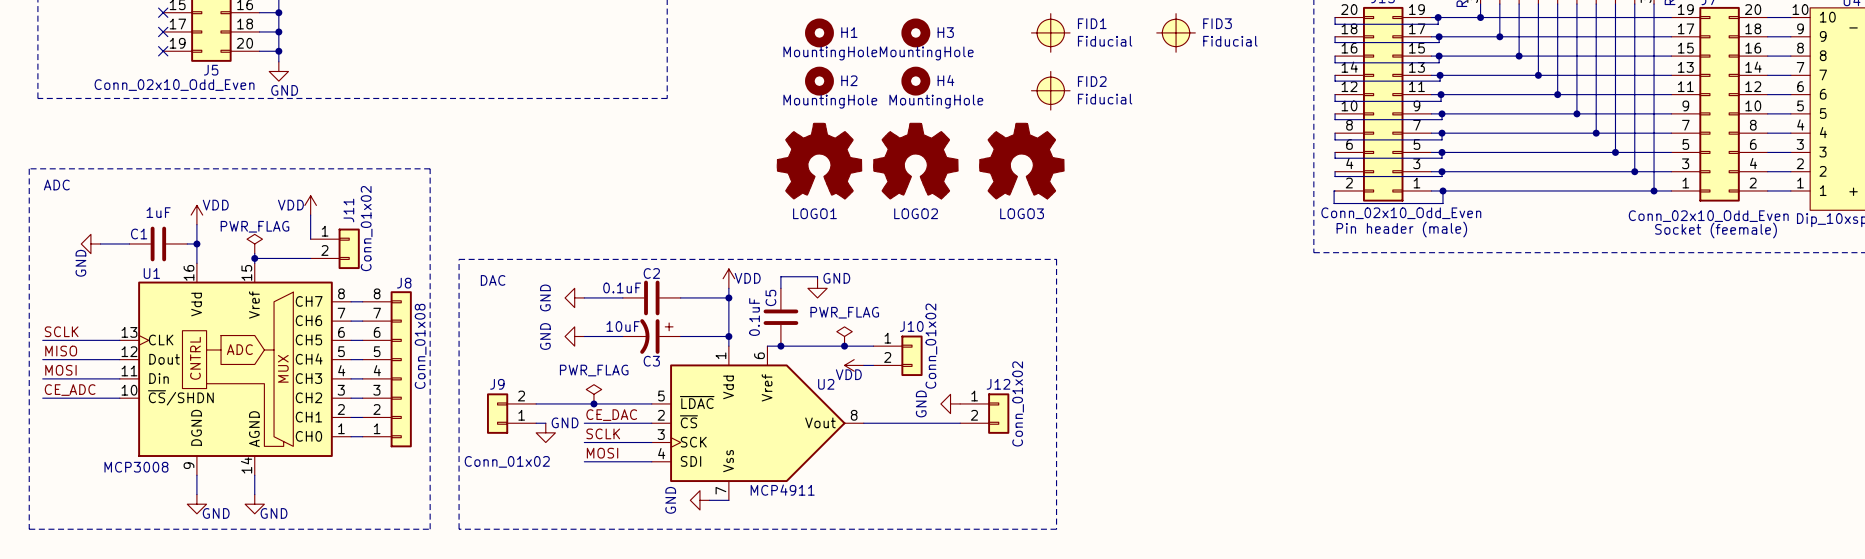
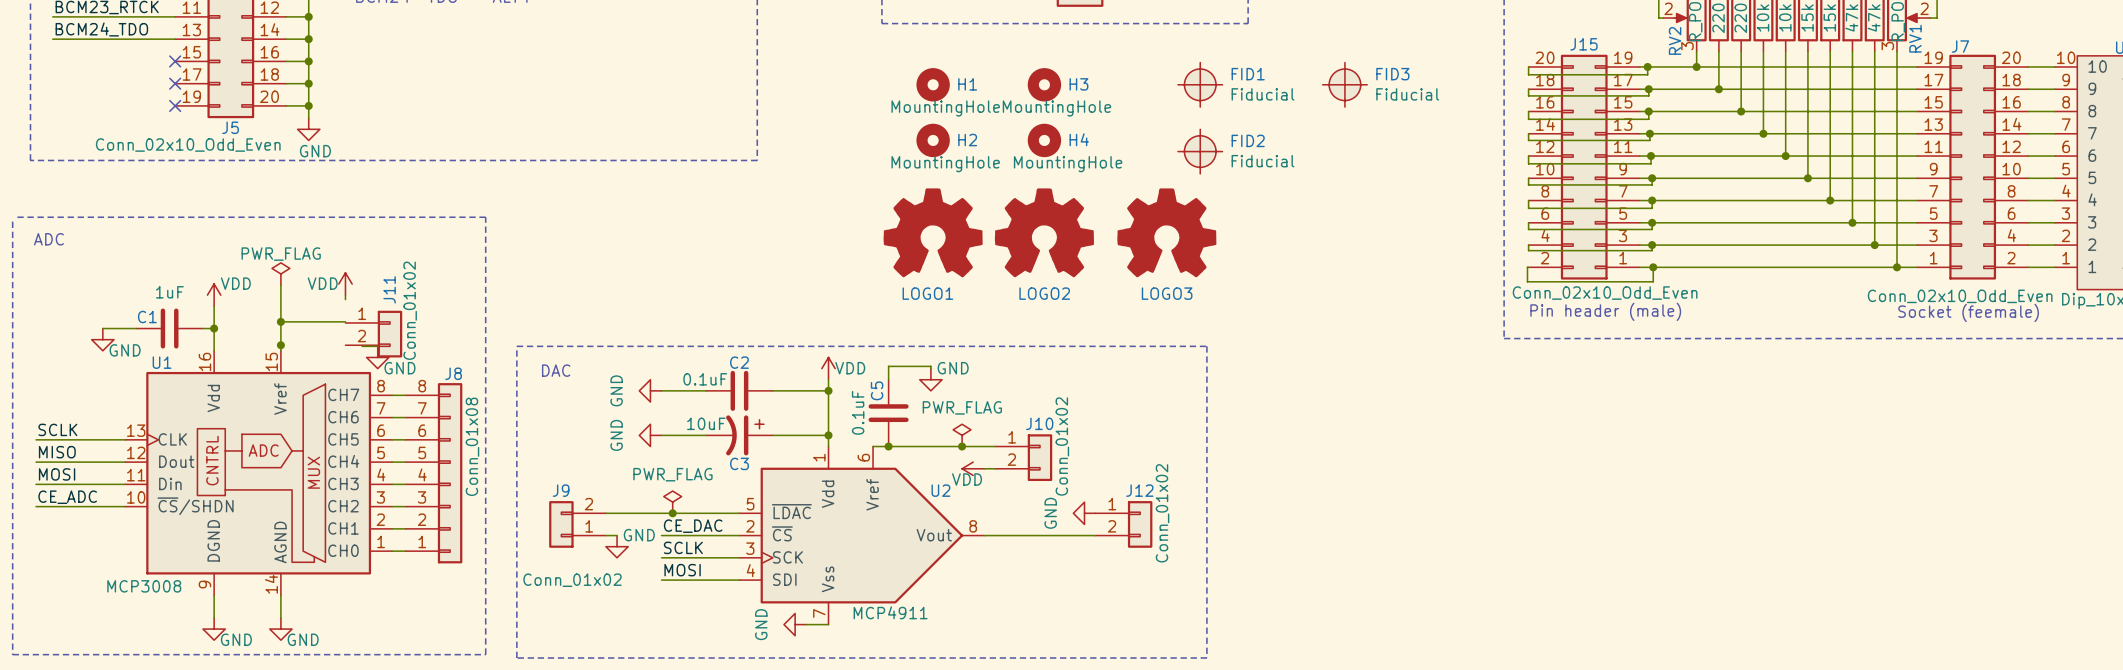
line: none -> (13, 217) (485, 217) (485, 654) (12, 654) (12, 221)
line: (29, 168) (29, 529) (430, 529) (430, 168) (29, 168) -> none
text position: ADC (56, 185) -> ADC (48, 239)
wire: none -> (280, 285) (280, 339)
wire: (310, 218) (310, 239) -> none
junction: none -> (280, 321)
power symbol rotation: 0° (90, 243) -> 90° counterclockwise (102, 339)
power symbol position: GND (90, 243) -> GND (102, 339)
power symbol position: PWR_FLAG (254, 243) -> PWR_FLAG (280, 274)
wire: (254, 258) (310, 258) -> (280, 321) (345, 321)
wire: none -> (362, 346) (377, 346)
power symbol: none -> GND (377, 357)

